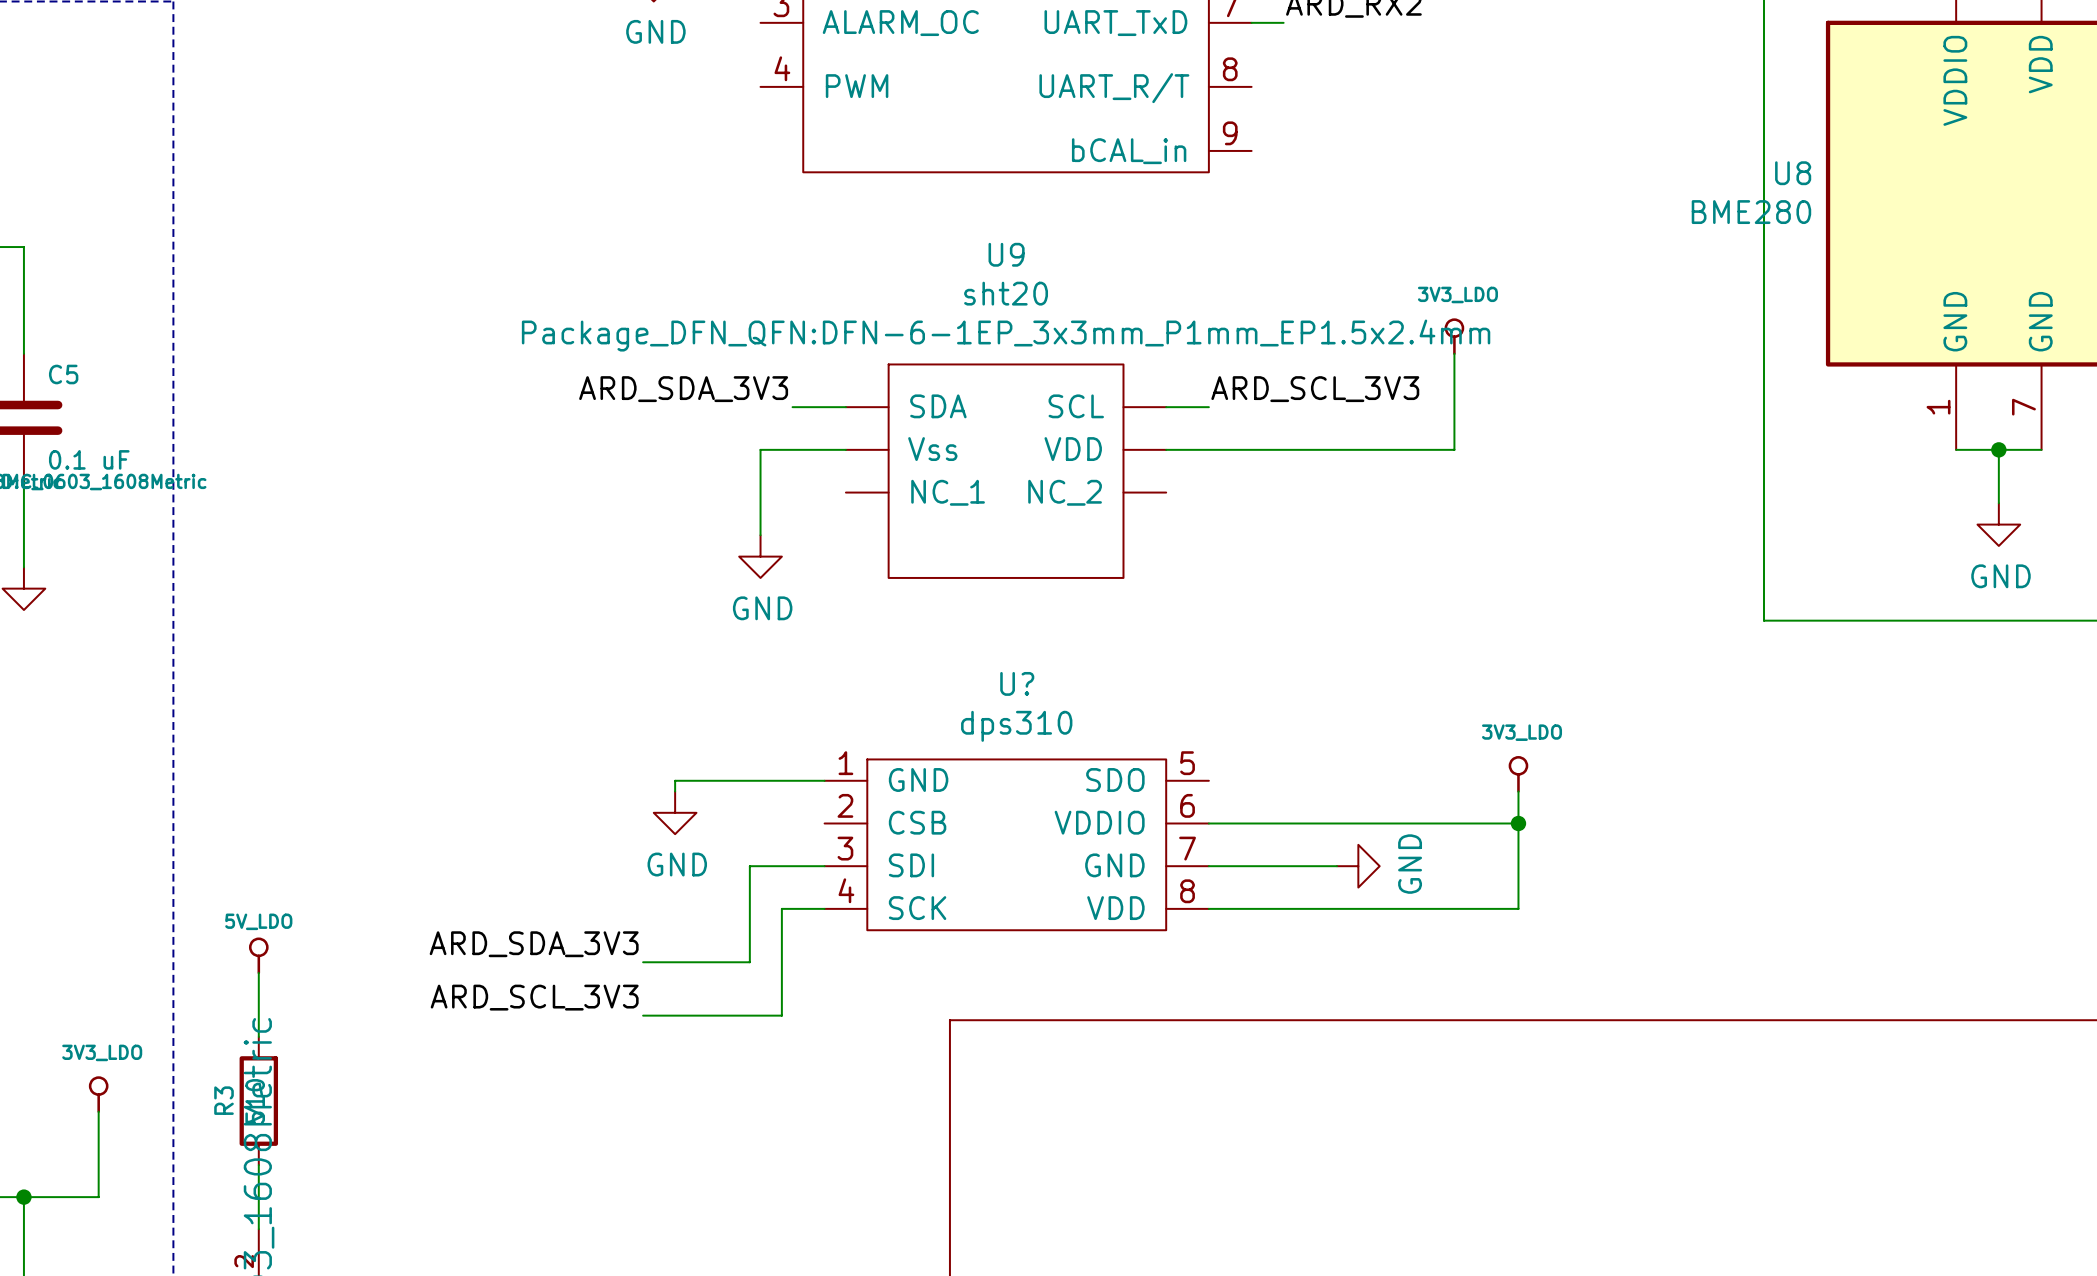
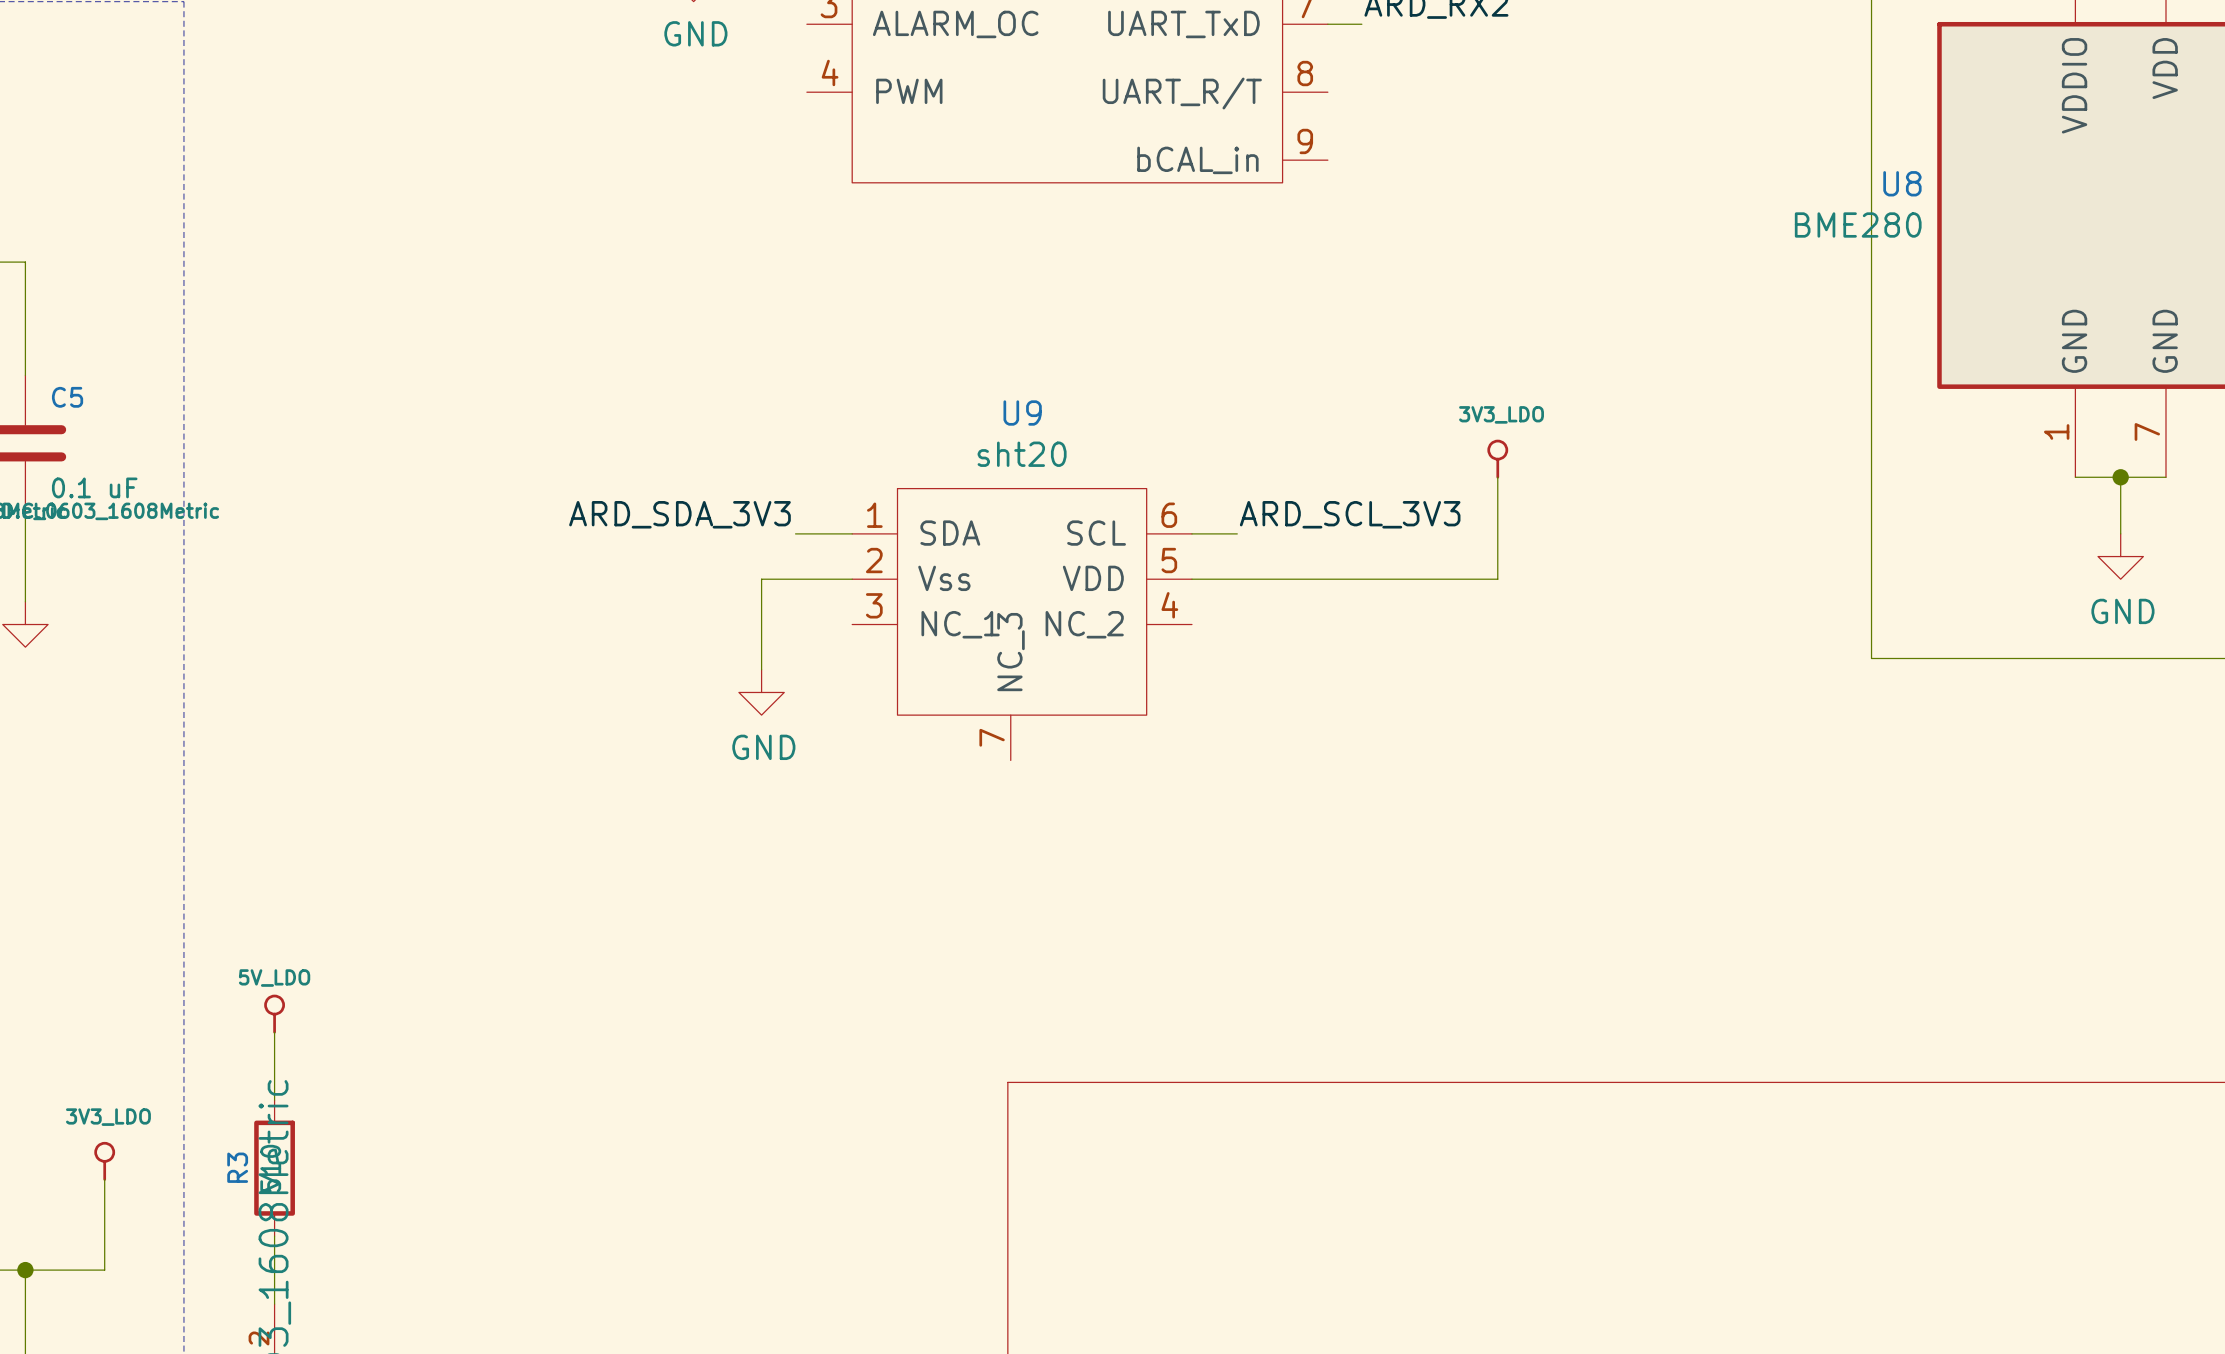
U9 text: Package_DFN_QFN:DFN-6-1EP_3x3mm_P1mm_EP1.5x2.4mm (1006, 335) -> none
power symbol position: 3V3_LDO (1454, 336) -> 3V3_LDO (1497, 459)
wire: (1454, 353) (1454, 449) (1166, 449) -> (1497, 477) (1497, 579) (1191, 579)
U9 symbol: [845, 364, 1167, 578] -> [852, 488, 1192, 761]
label position: ARD_SDA_3V3 (683, 389) -> ARD_SDA_3V3 (679, 514)
label position: ARD_SCL_3V3 (1315, 389) -> ARD_SCL_3V3 (1350, 514)
wire: (792, 407) (845, 407) -> (795, 533) (852, 533)
wire: (1166, 407) (1208, 407) -> (1191, 533) (1237, 533)
wire: (845, 449) (760, 449) (760, 535) -> (852, 579) (761, 579) (761, 669)
power symbol: GND (760, 556) -> none
power symbol: none -> GND (761, 692)
power symbol: 3V3_LDO (1518, 774) -> none
wire: (824, 780) (675, 780) (675, 791) -> none
wire: (1518, 791) (1518, 908) (1208, 908) -> none
power symbol: GND (675, 812) -> none
wire: (1208, 823) (1518, 823) -> none
junction: (1518, 823) -> none
U?: dps310 (1016, 844) -> none
wire: (824, 866) (749, 866) (749, 962) (643, 962) -> none
wire: (1208, 866) (1336, 866) -> none
power symbol: GND (1358, 866) -> none
wire: (824, 908) (781, 908) (781, 1015) (643, 1015) -> none
label: ARD_SDA_3V3 (534, 944) -> none
label: ARD_SCL_3V3 (534, 997) -> none

